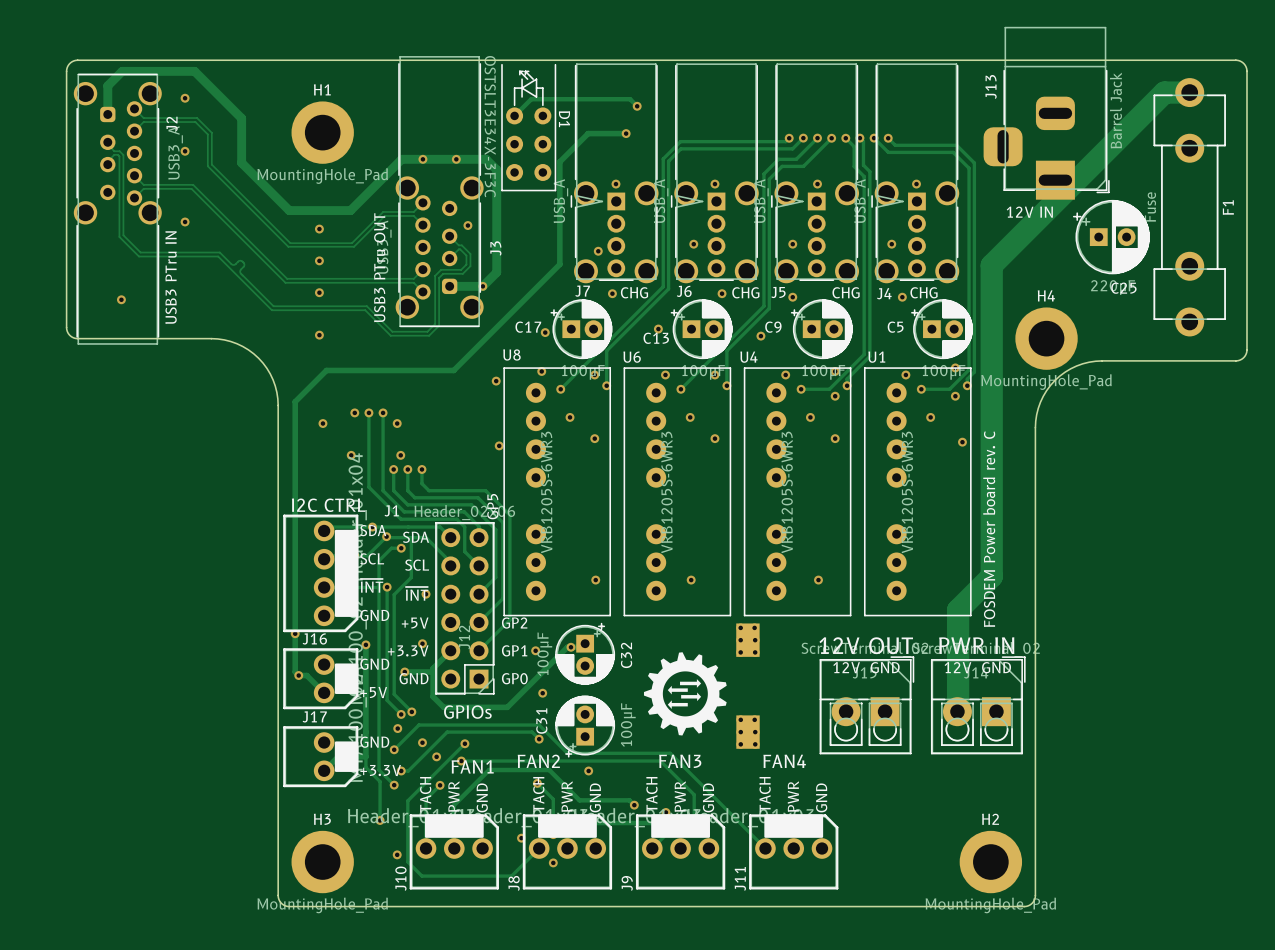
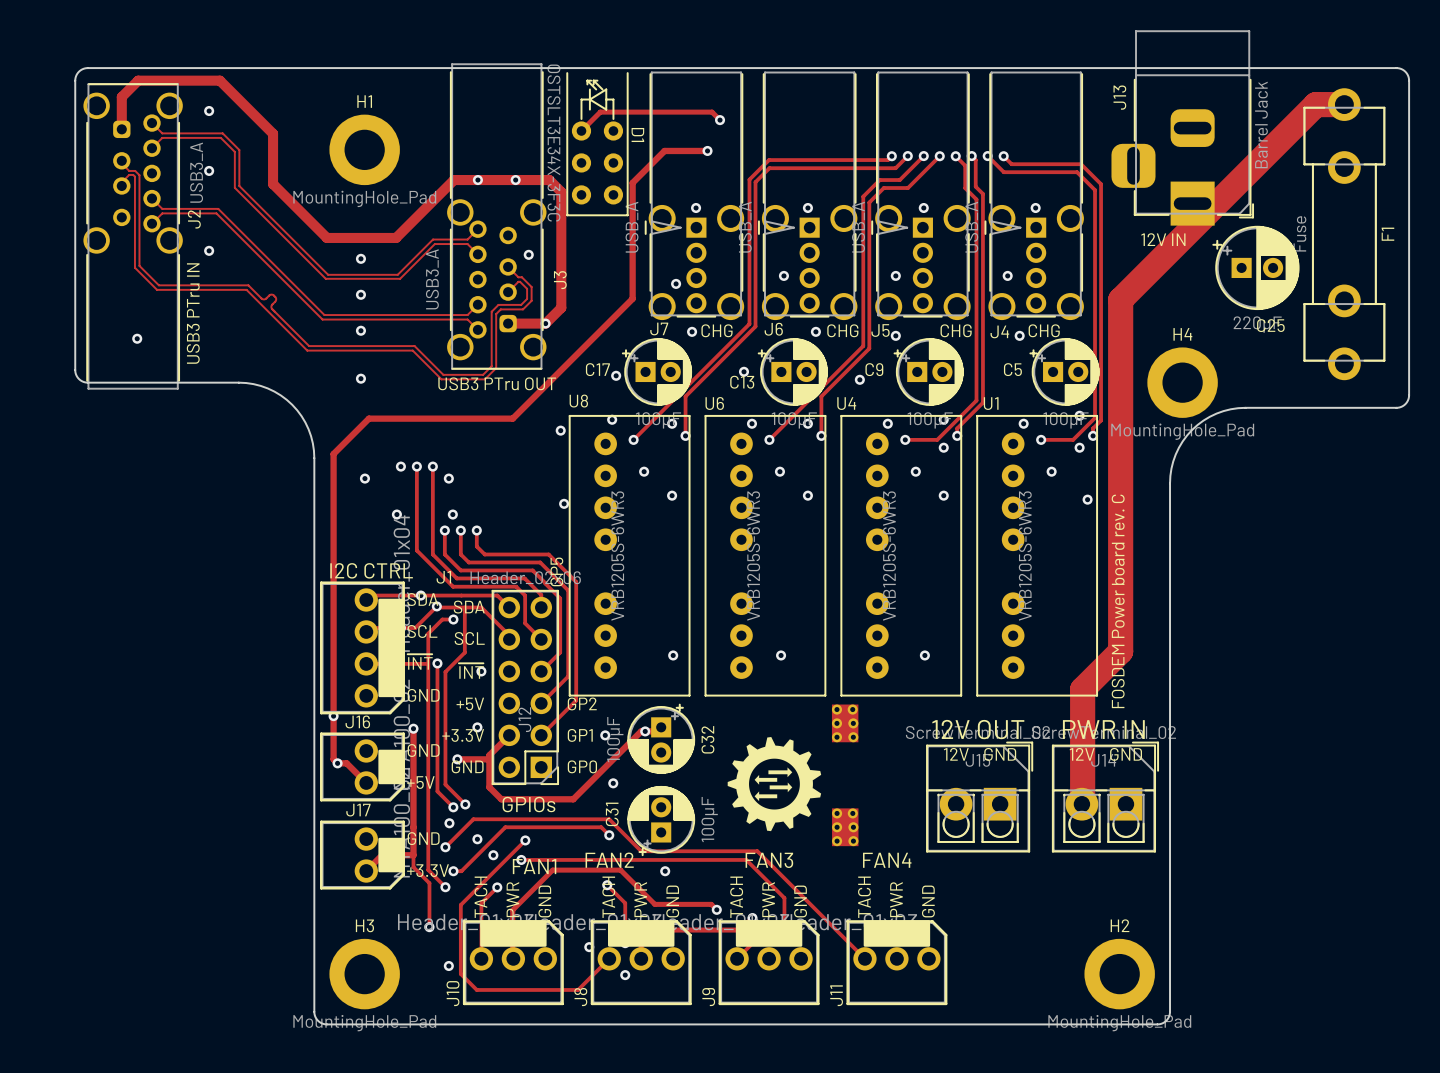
J2 name position: J2 (172, 123) -> J2 (194, 219)
J3 text rotation: 0° (379, 267) -> 90° clockwise (497, 383)

